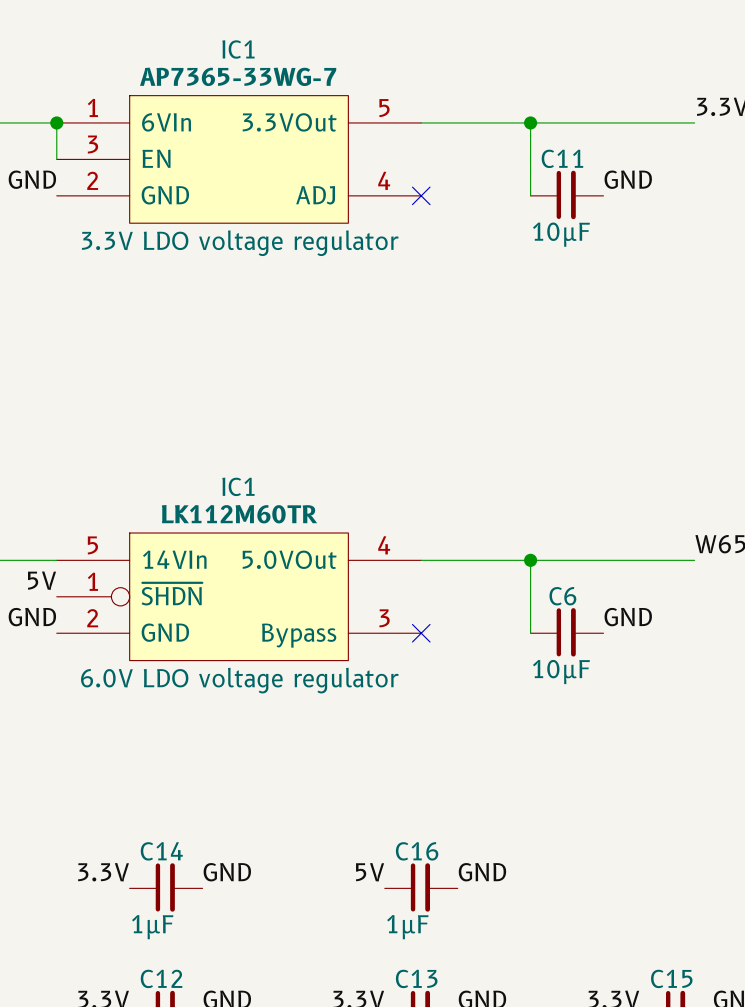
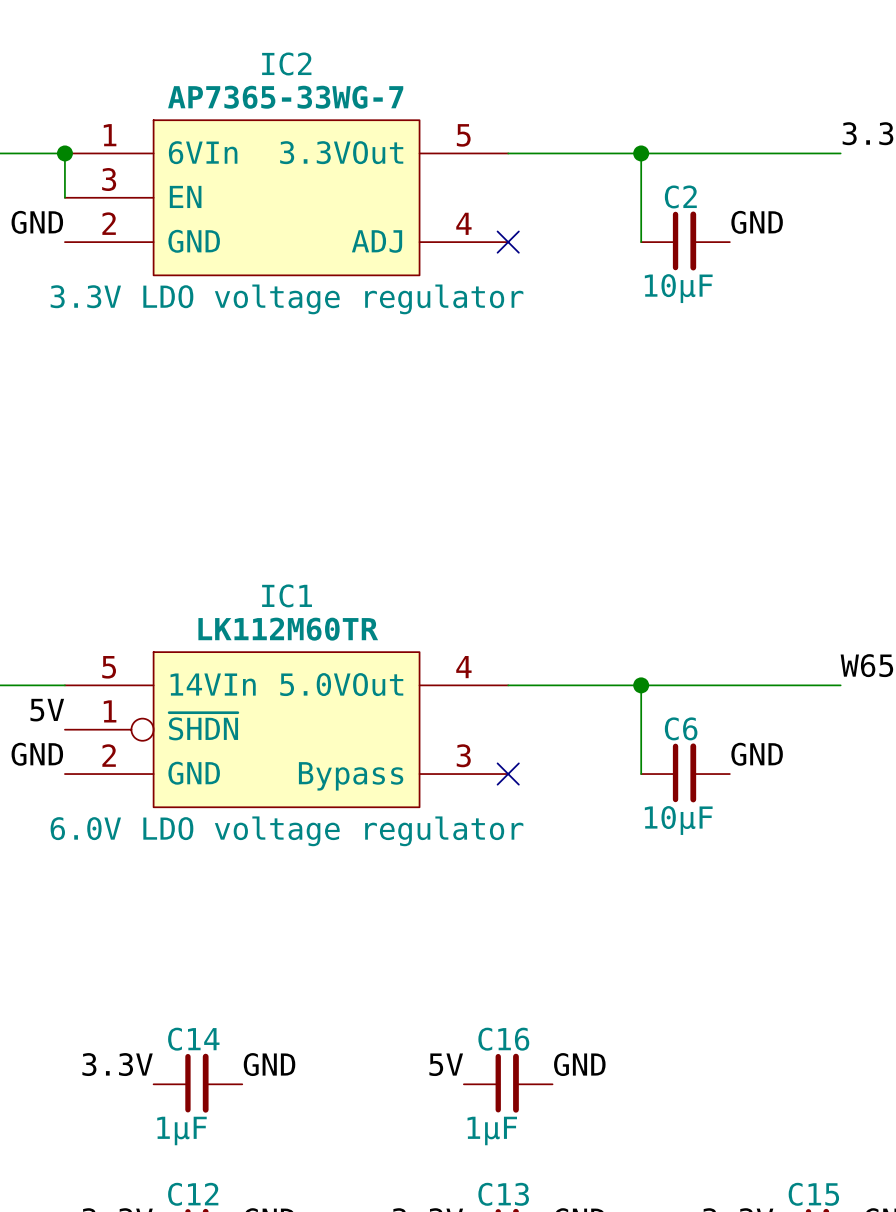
IC1 name: IC1 (238, 49) -> IC2 (286, 63)
C11 name: C11 (562, 158) -> C2 (680, 196)

